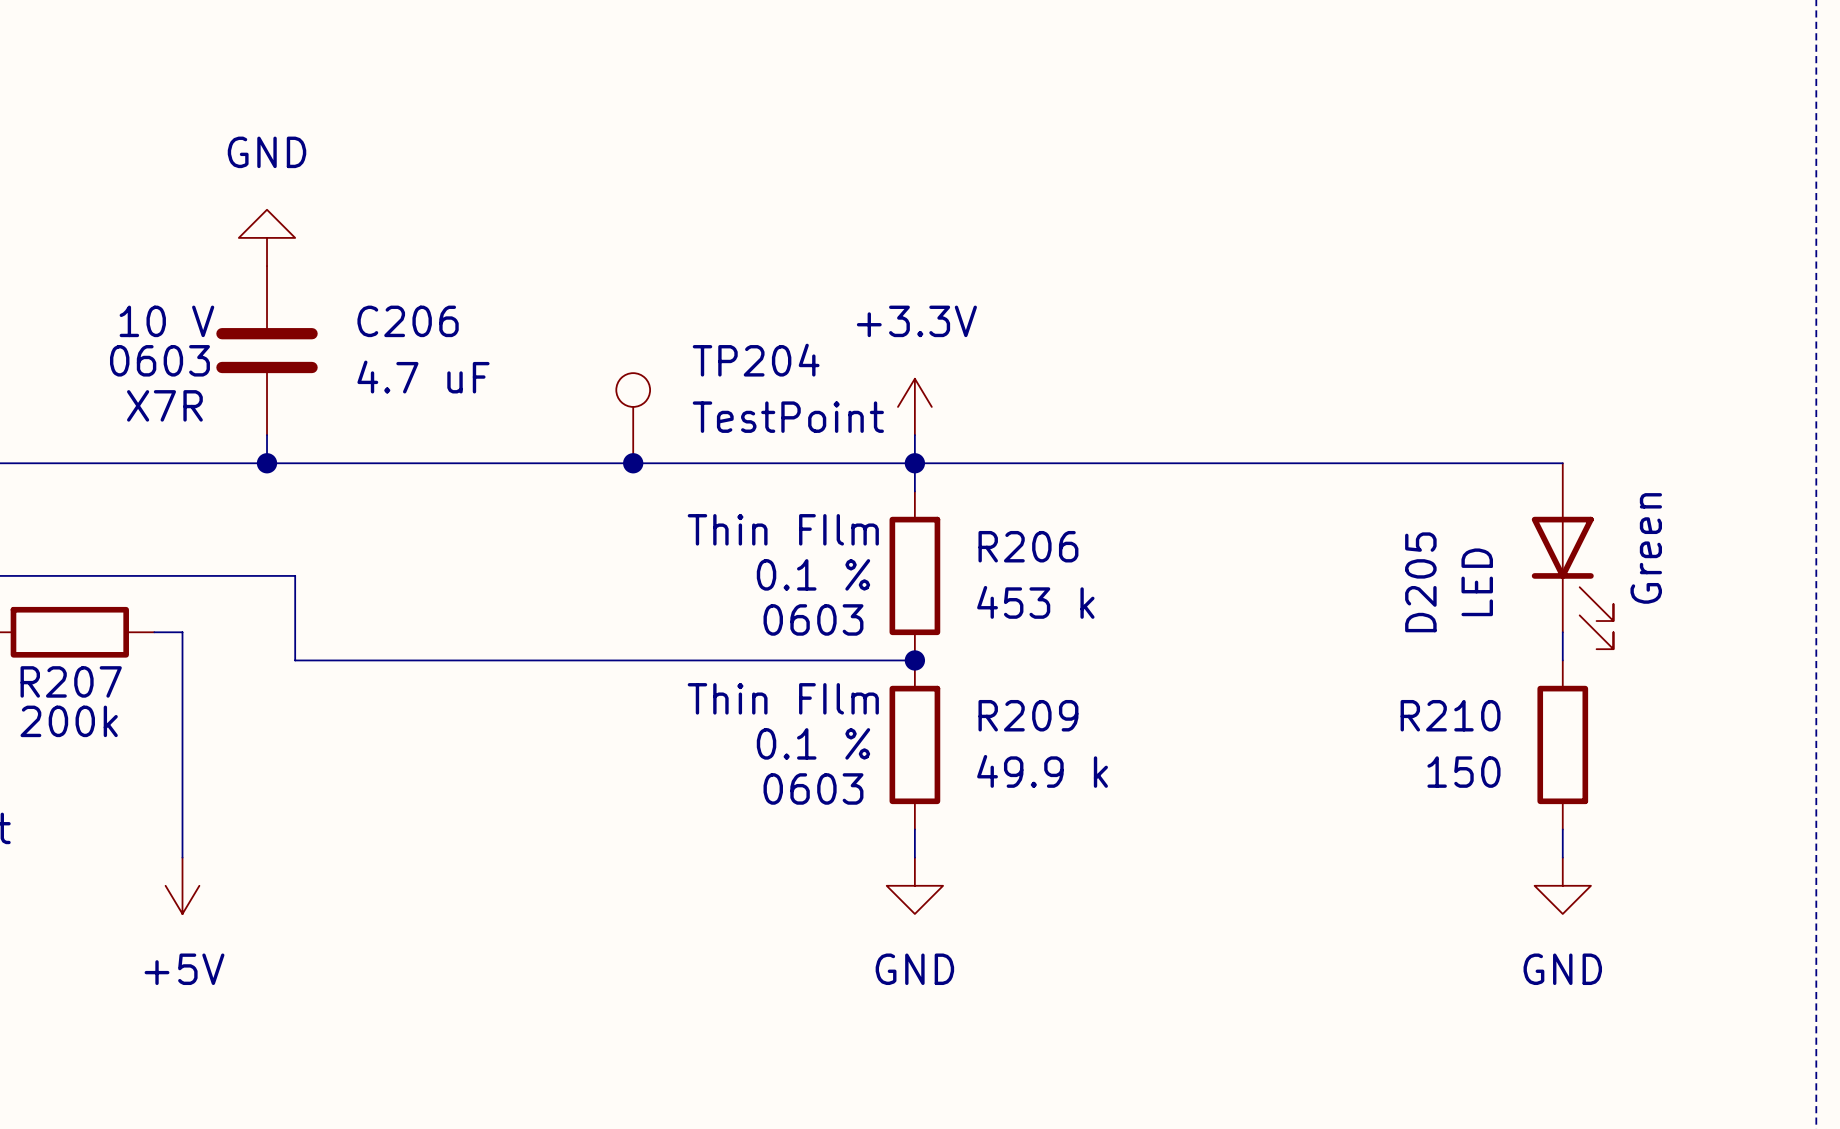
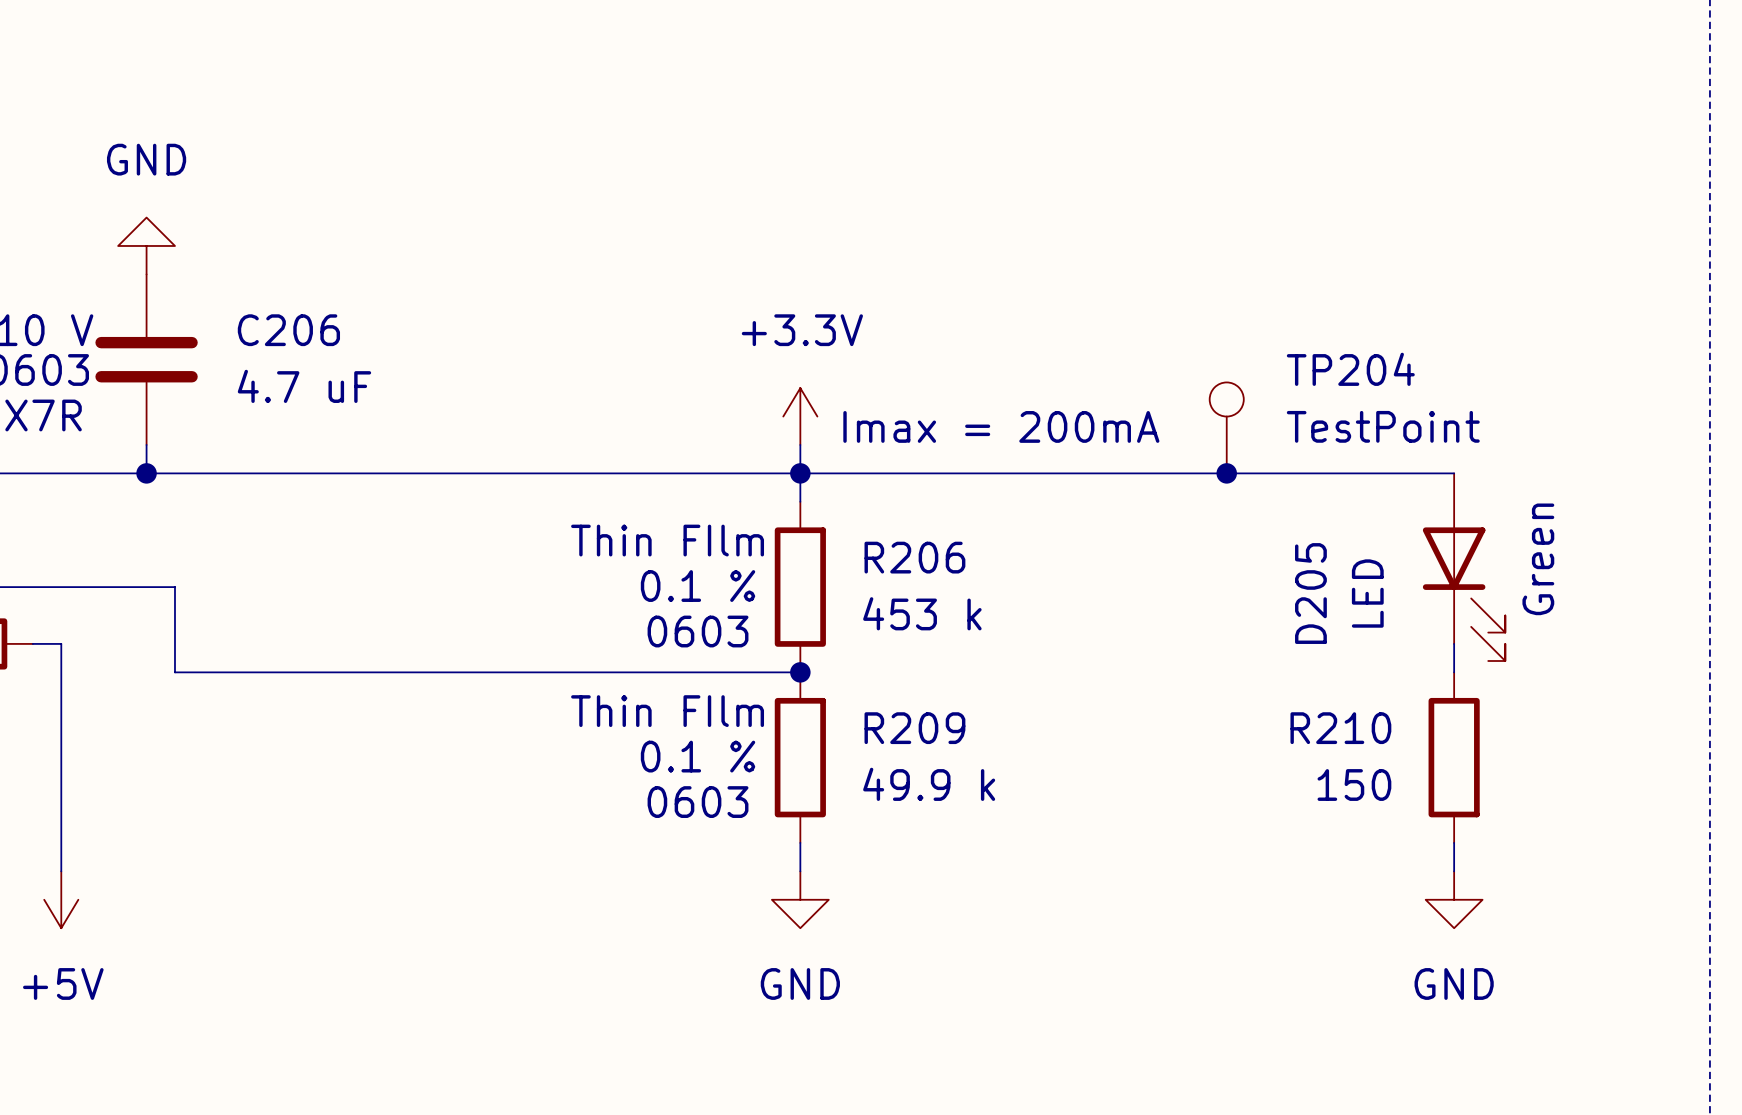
text: none -> Imax = 200mA (1001, 426)
TP204 position: (633, 418) -> (1226, 427)
junction: (633, 463) -> none
junction: none -> (1226, 473)

